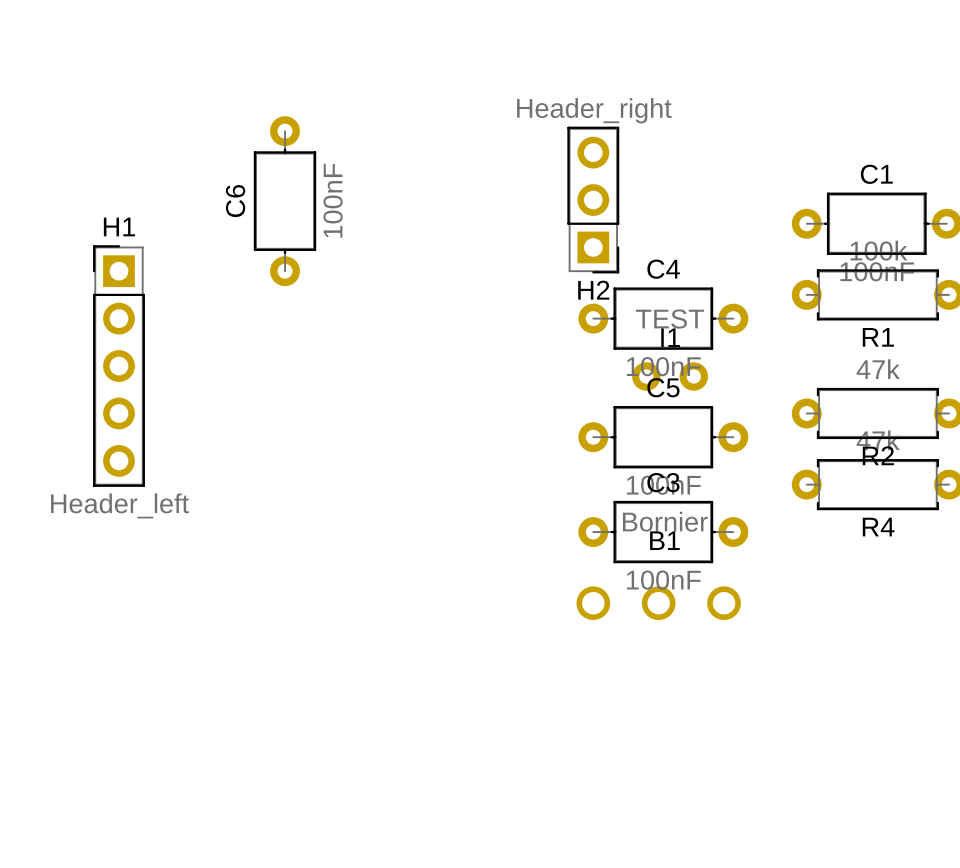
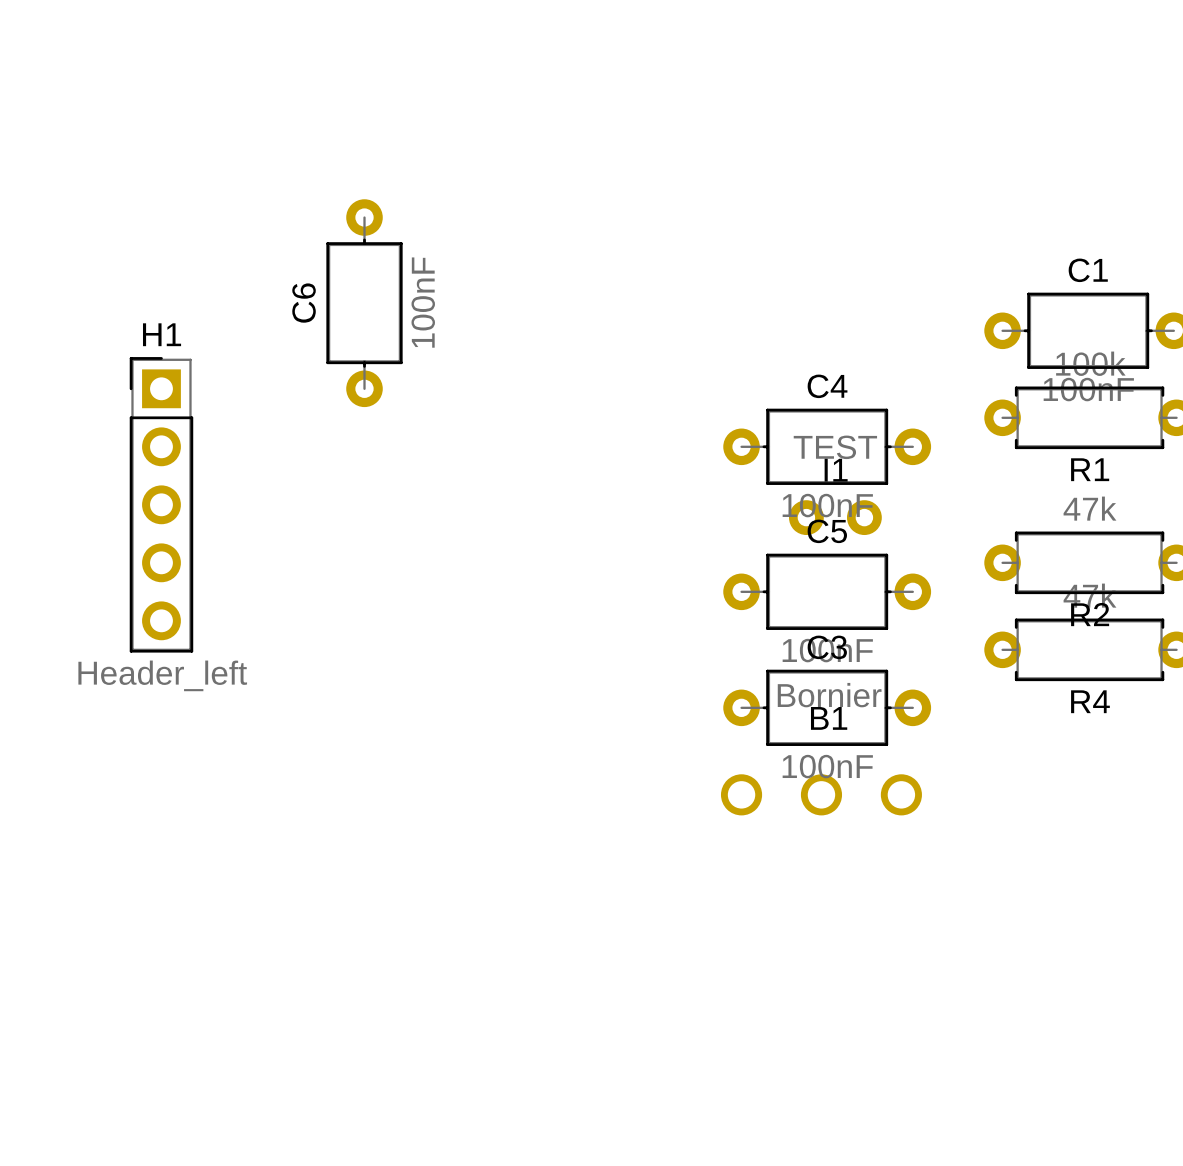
H2: Header_right (593, 200) -> none

